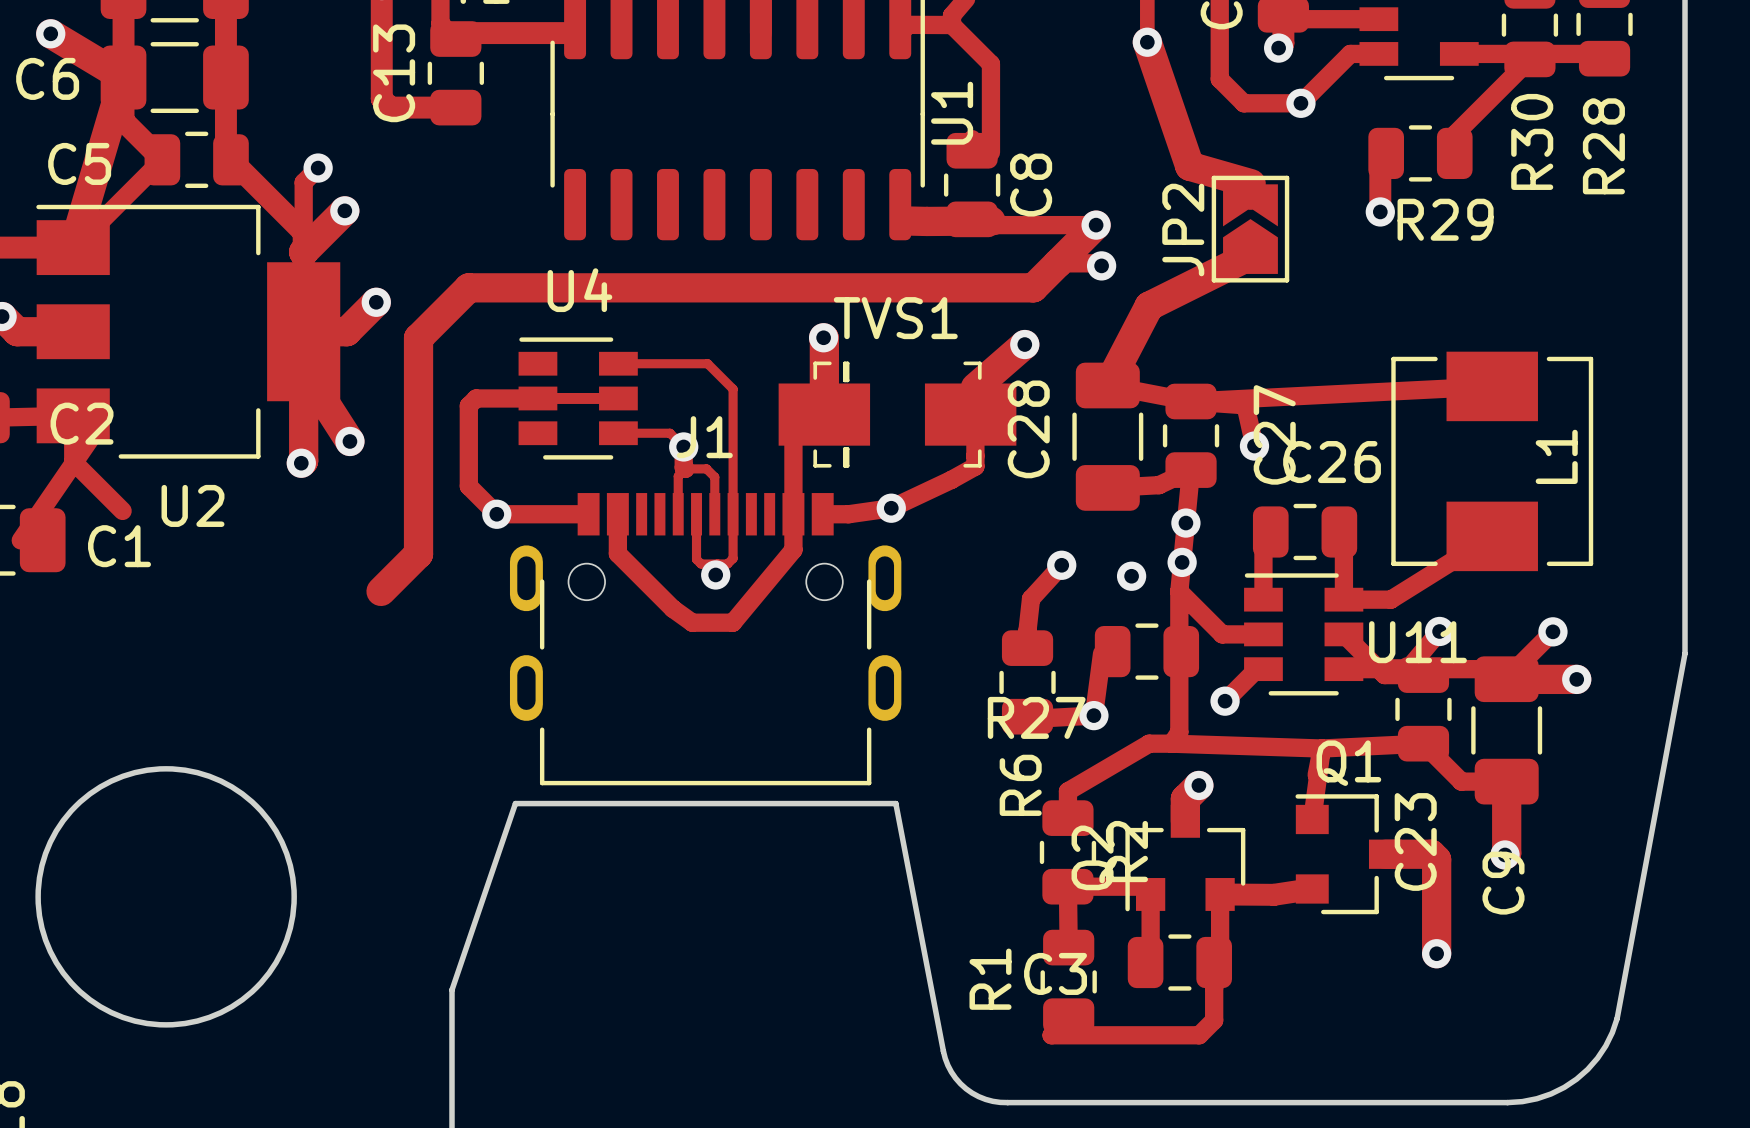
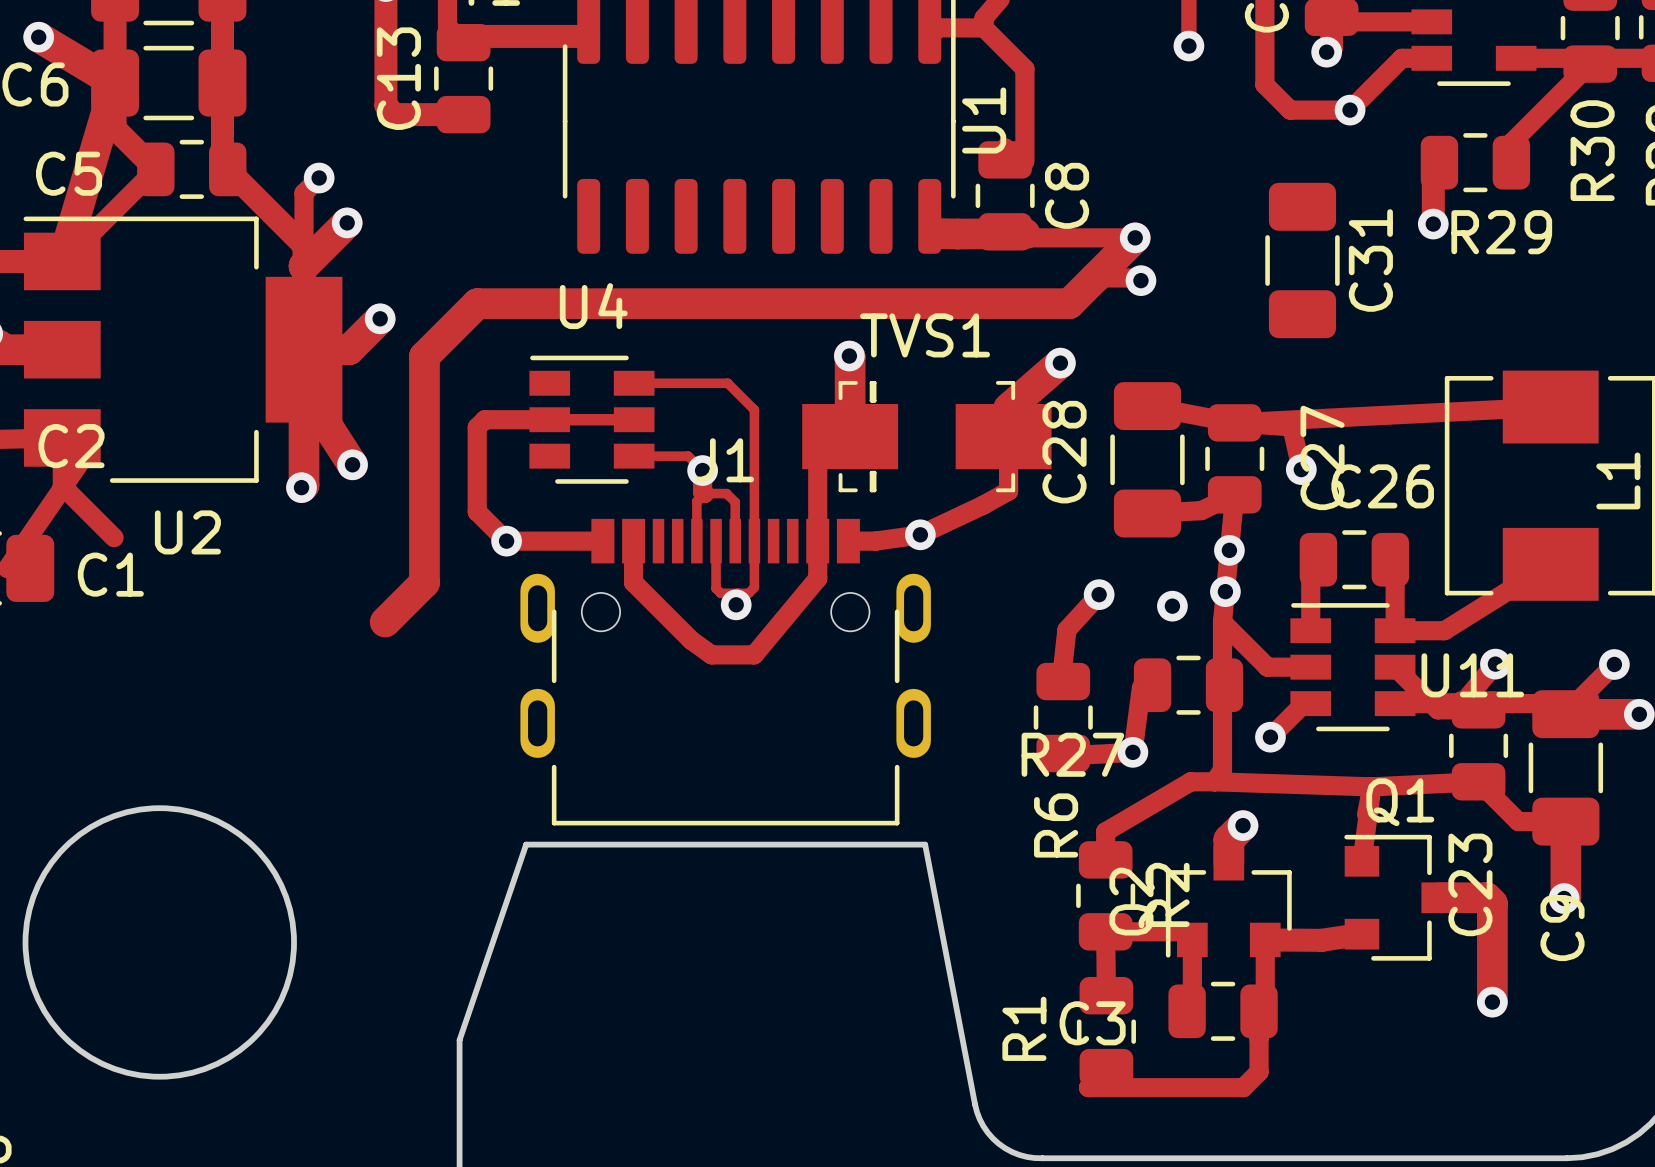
track: (1147, 42) (1189, 166) (1251, 183) (1250, 202) -> none
JP2: (1250, 229) -> none
C31: none -> (1302, 260)
track: (1250, 255) (1149, 306) (1107, 385) -> none

